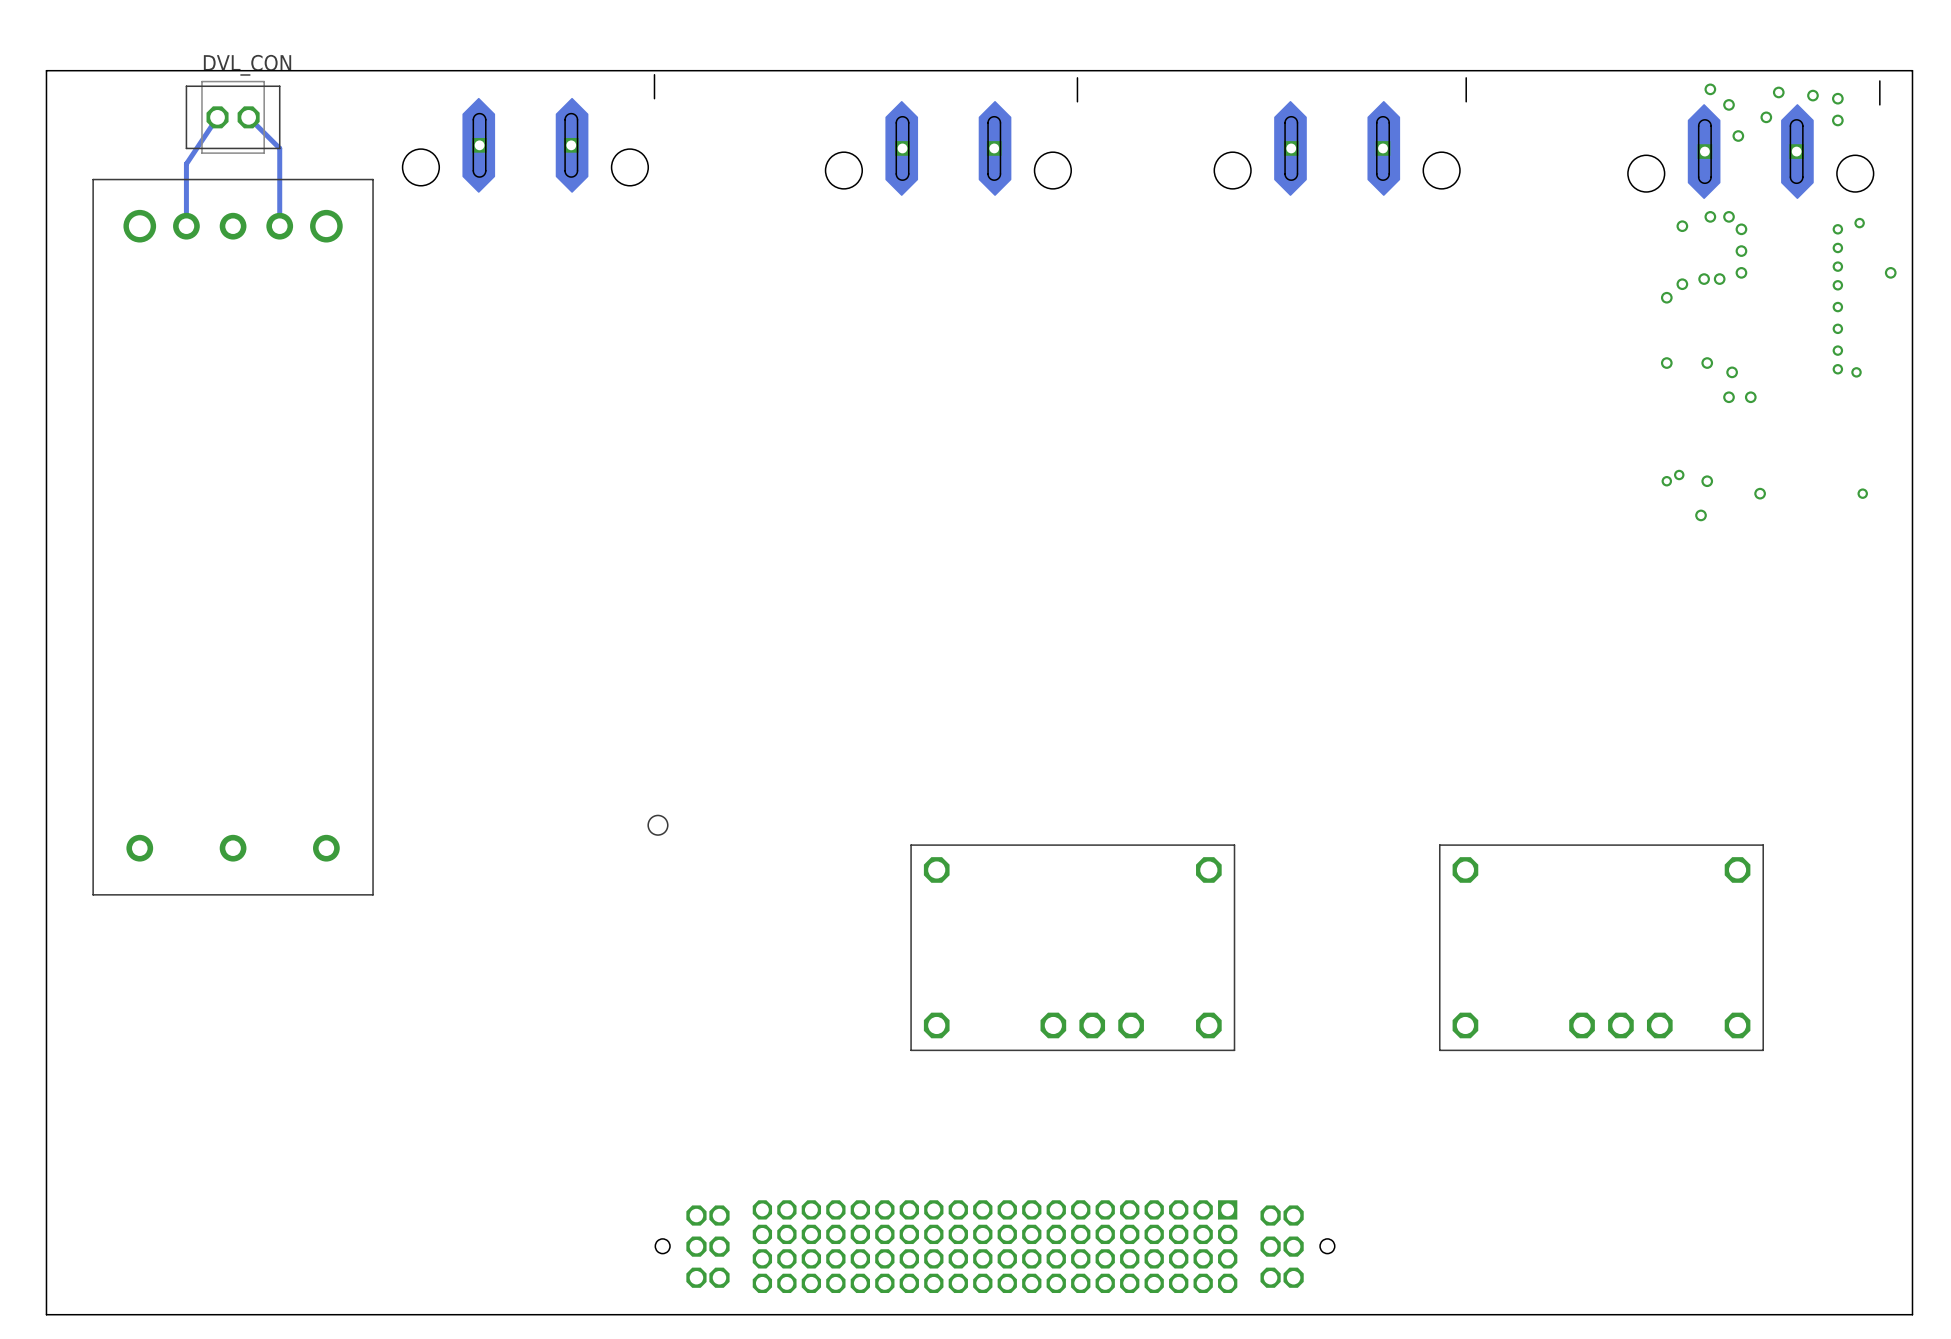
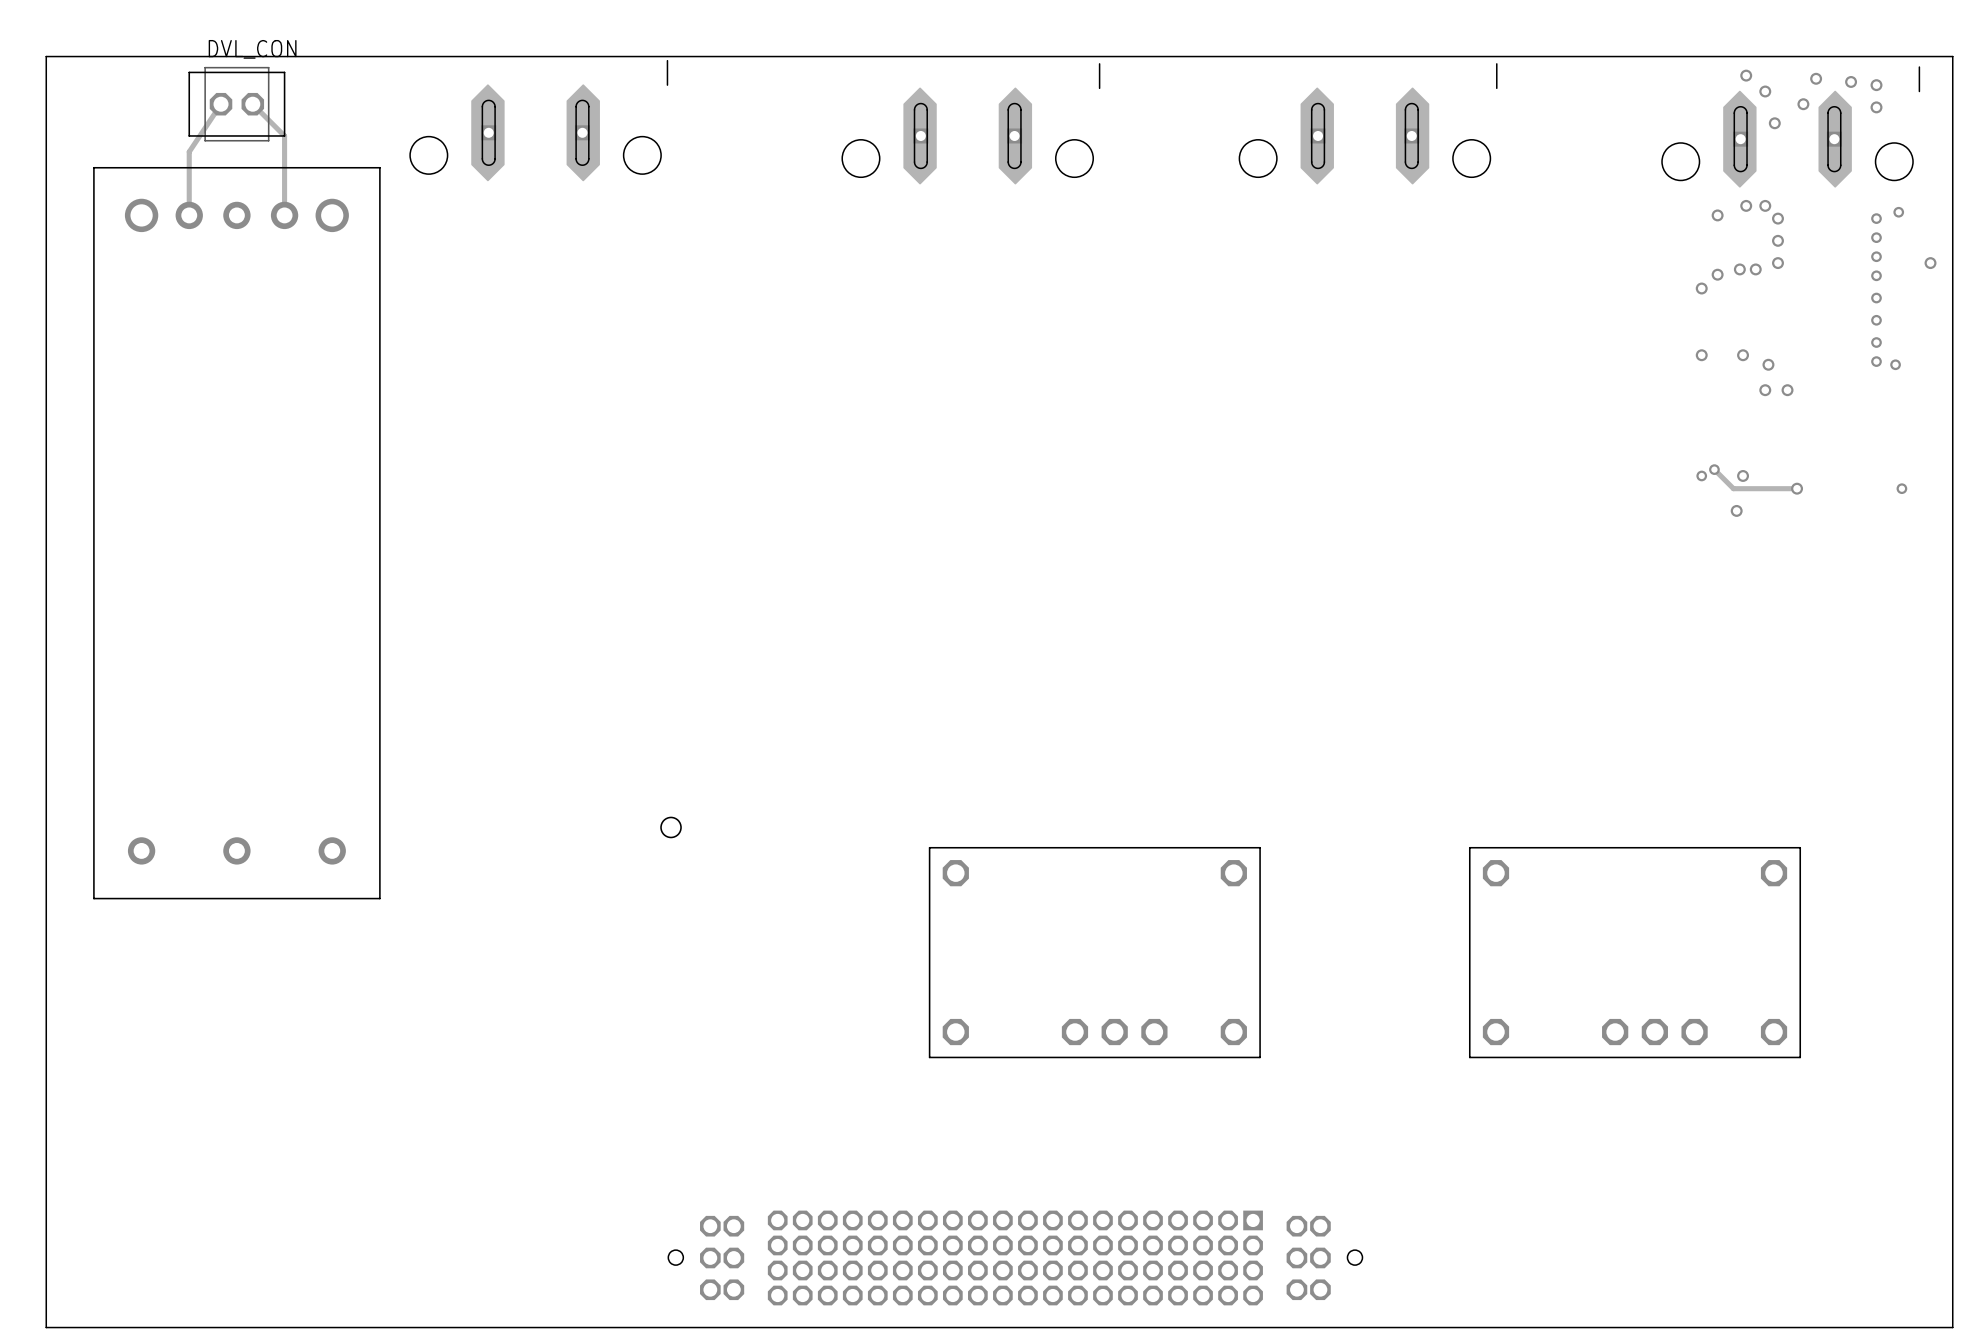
track: none -> (1714, 469) (1733, 488) (1797, 488)

